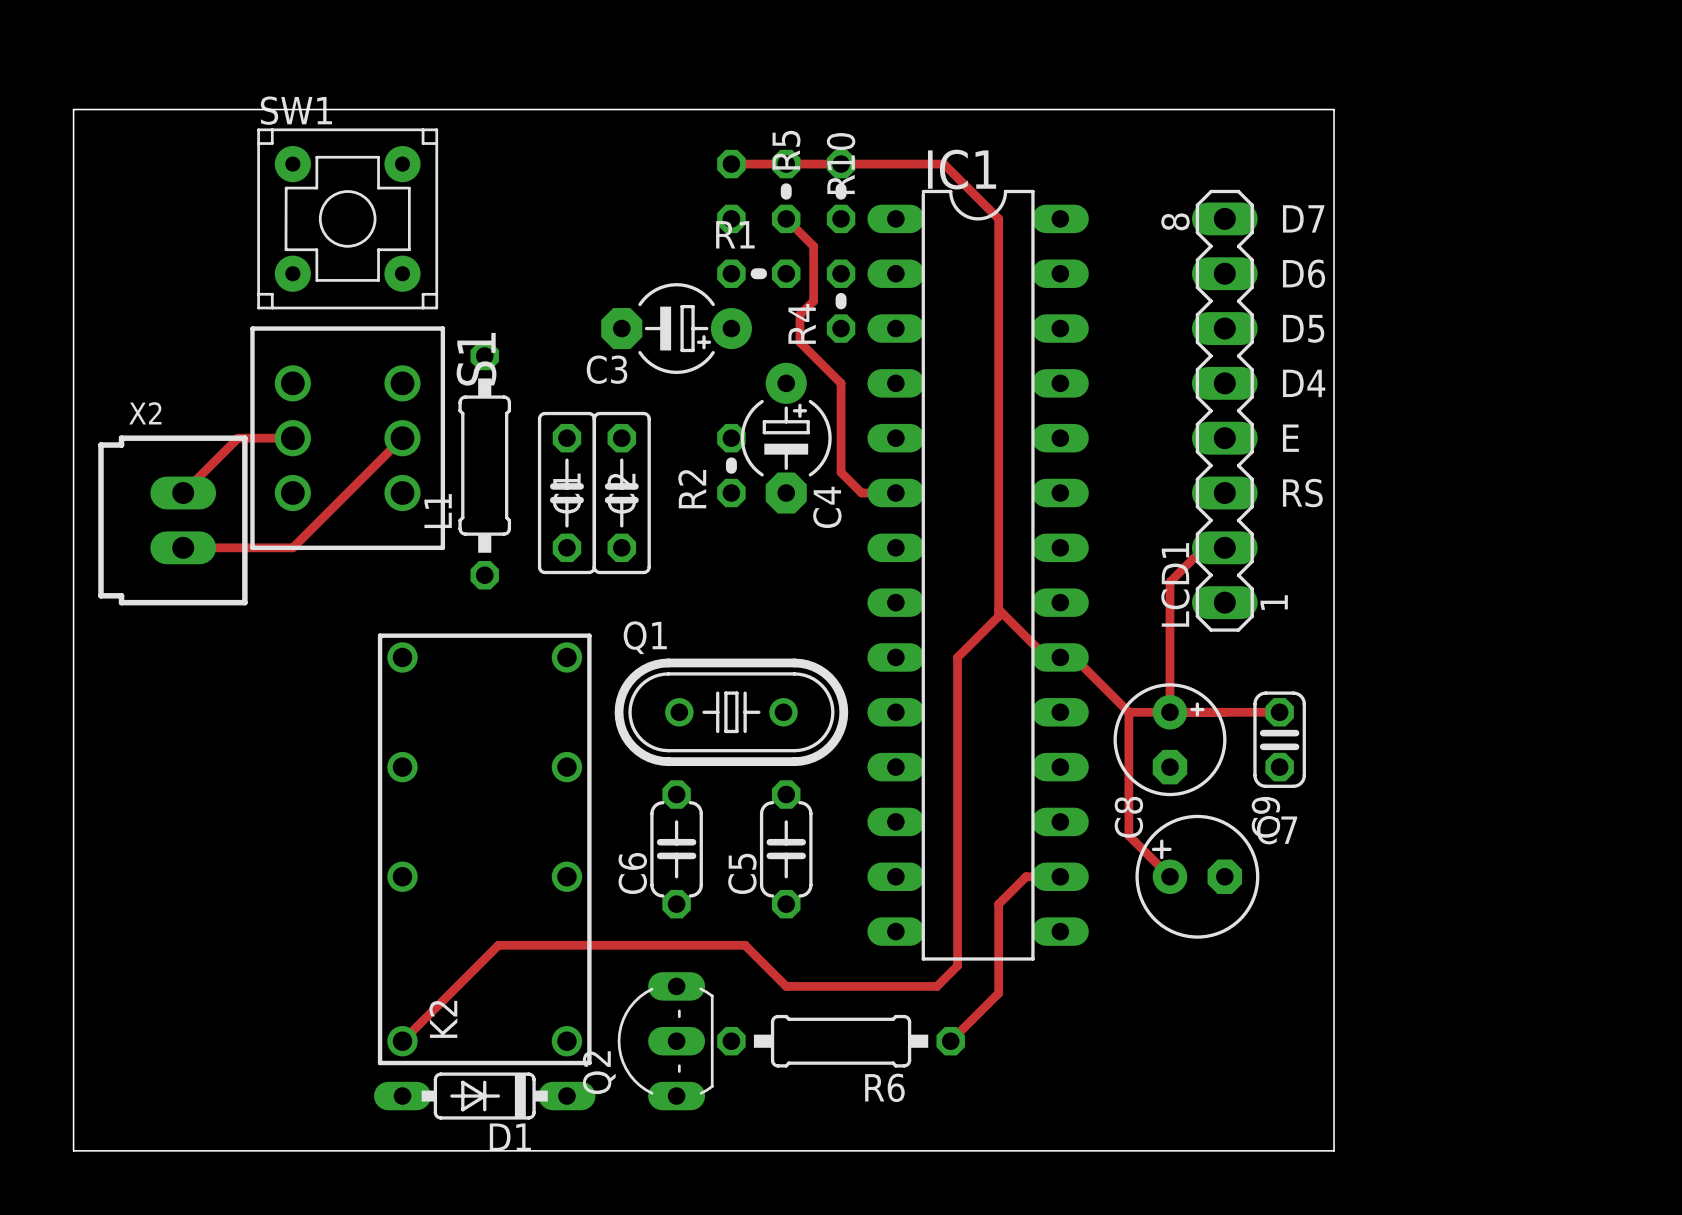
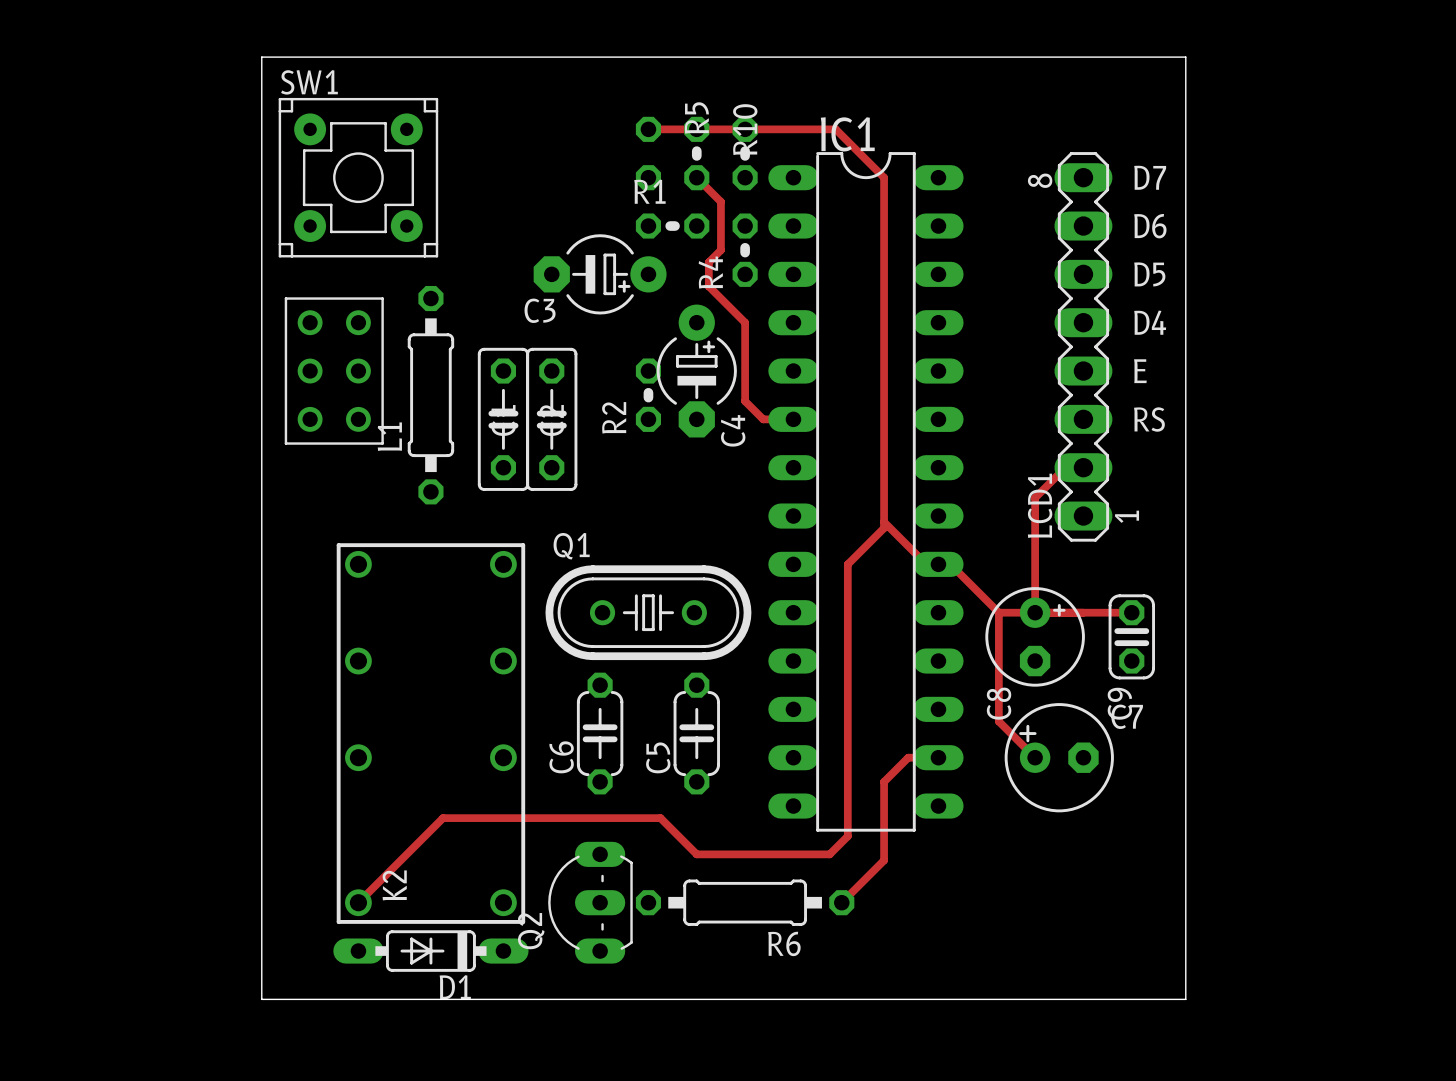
SW1 position: (347, 218) -> (358, 177)
track: (292, 438) (238, 438) (183, 493) -> none
S1: (347, 438) -> none
part: none -> (334, 371)
track: (402, 438) (292, 547) (183, 547) -> none
X2: (172, 520) -> none
board edge: (292, 1150) (73, 1150) (73, 109) (1334, 109) (1334, 1150) -> (261, 999) (261, 57) (1185, 57) (1185, 999) (1179, 999)

